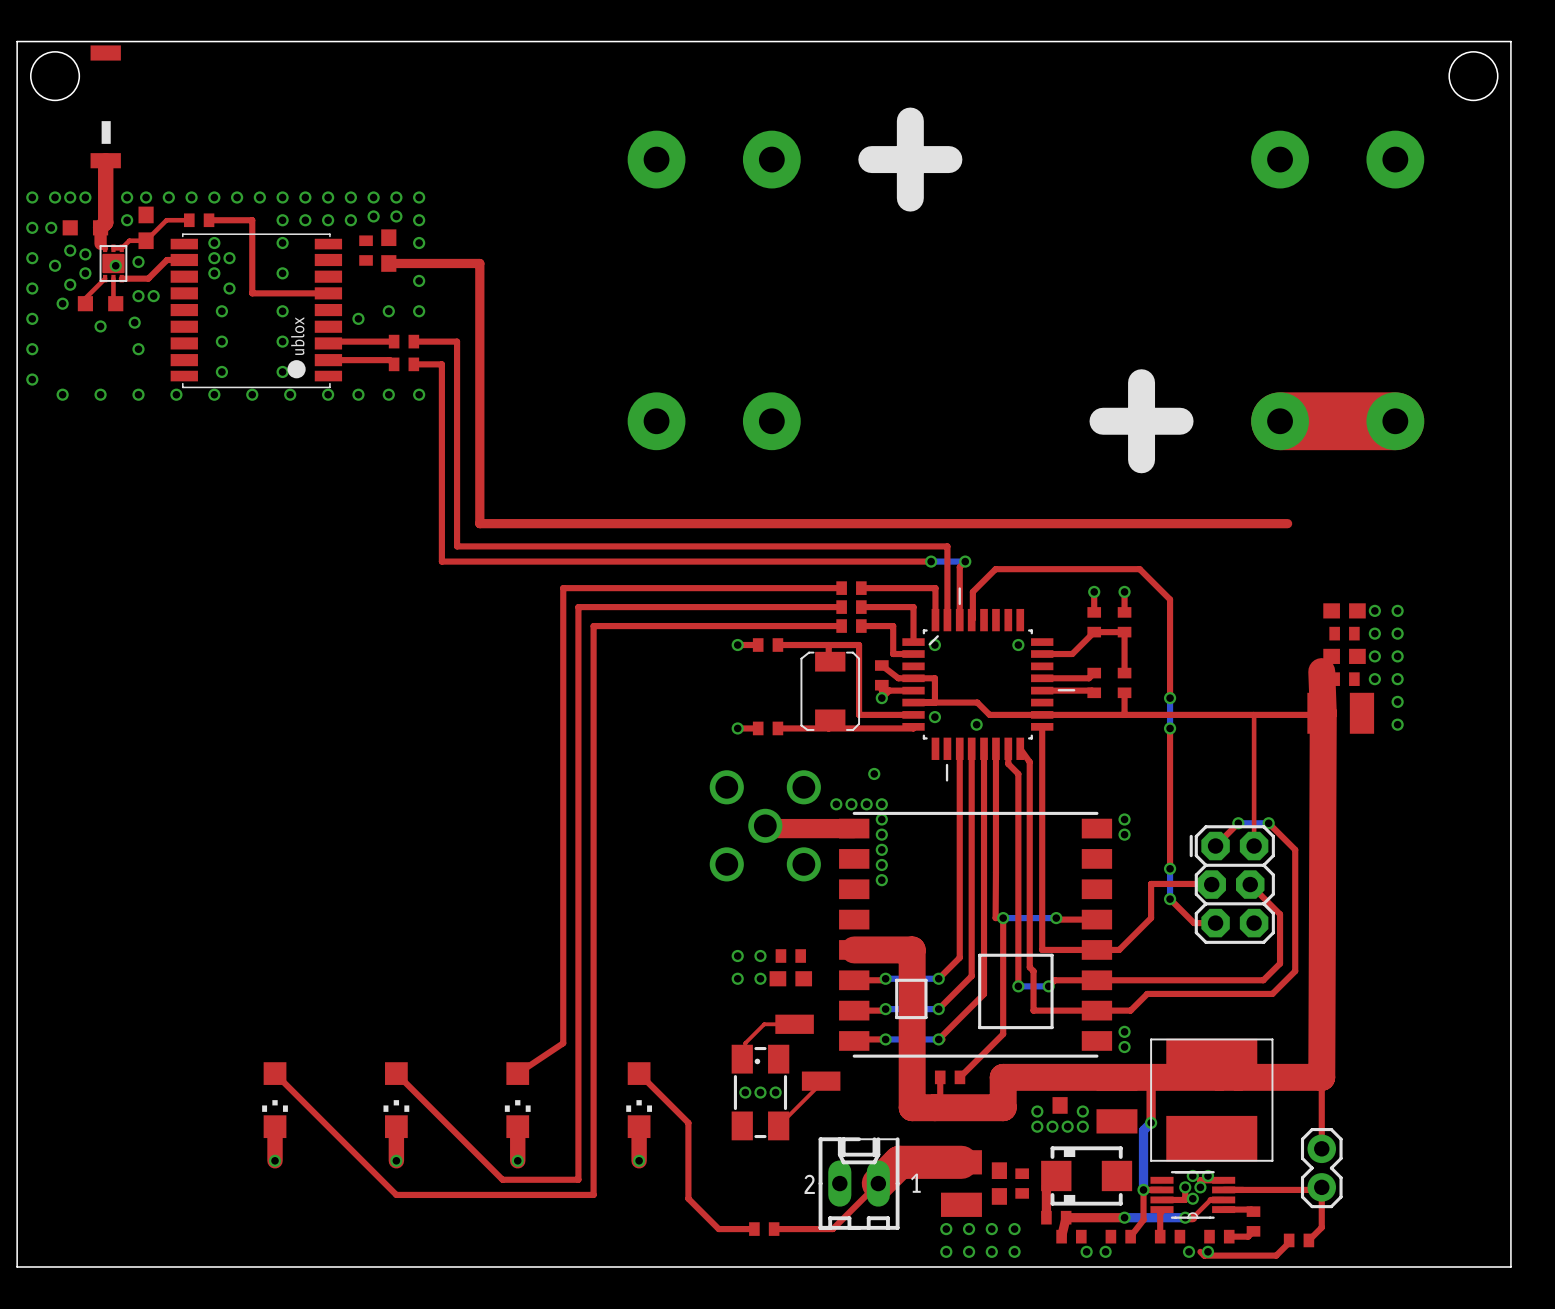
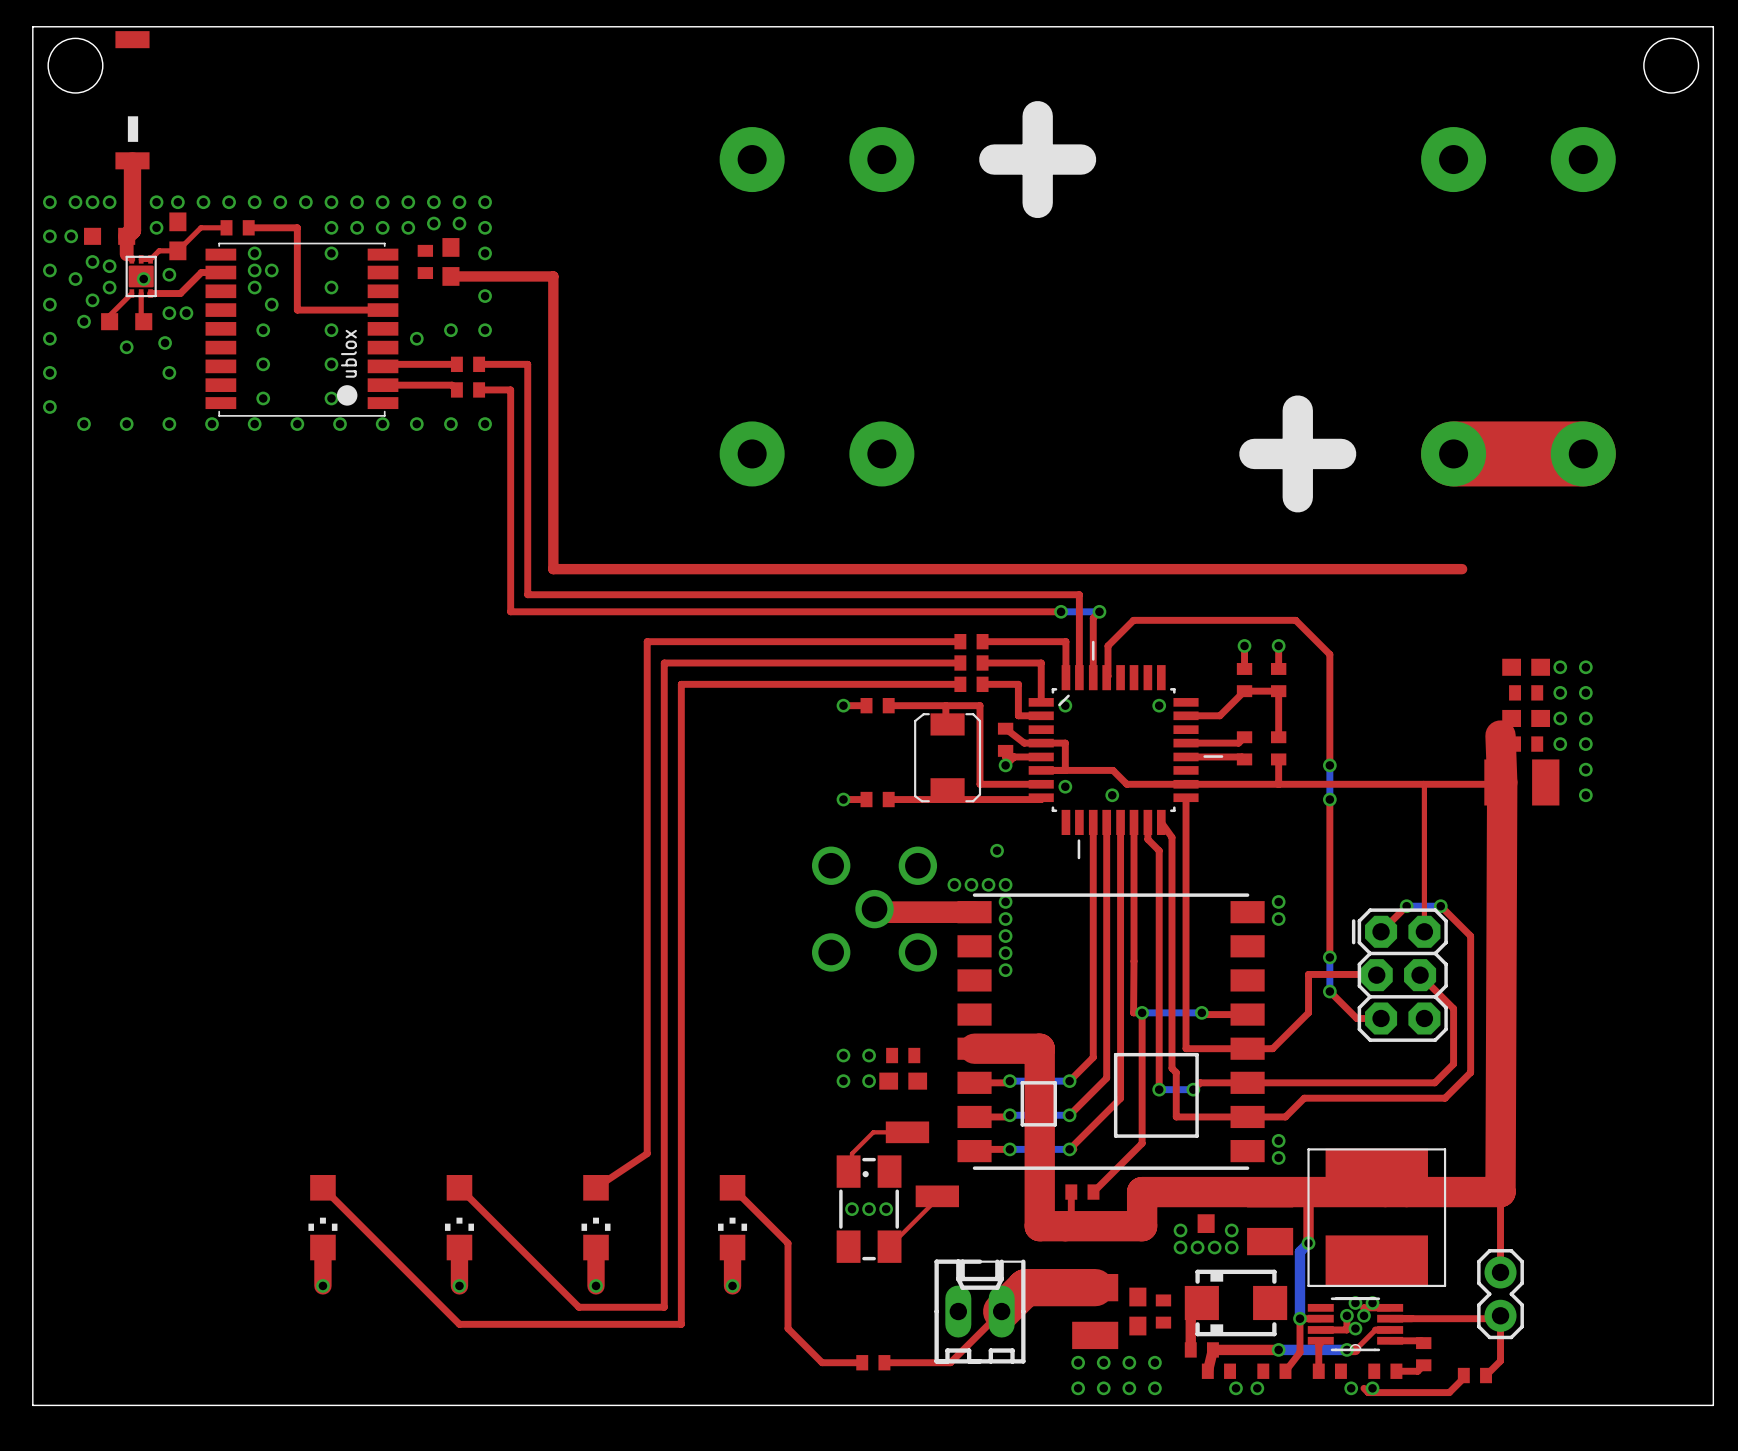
part text: 1 (915, 1183) -> none
part text: 2 (809, 1184) -> none

